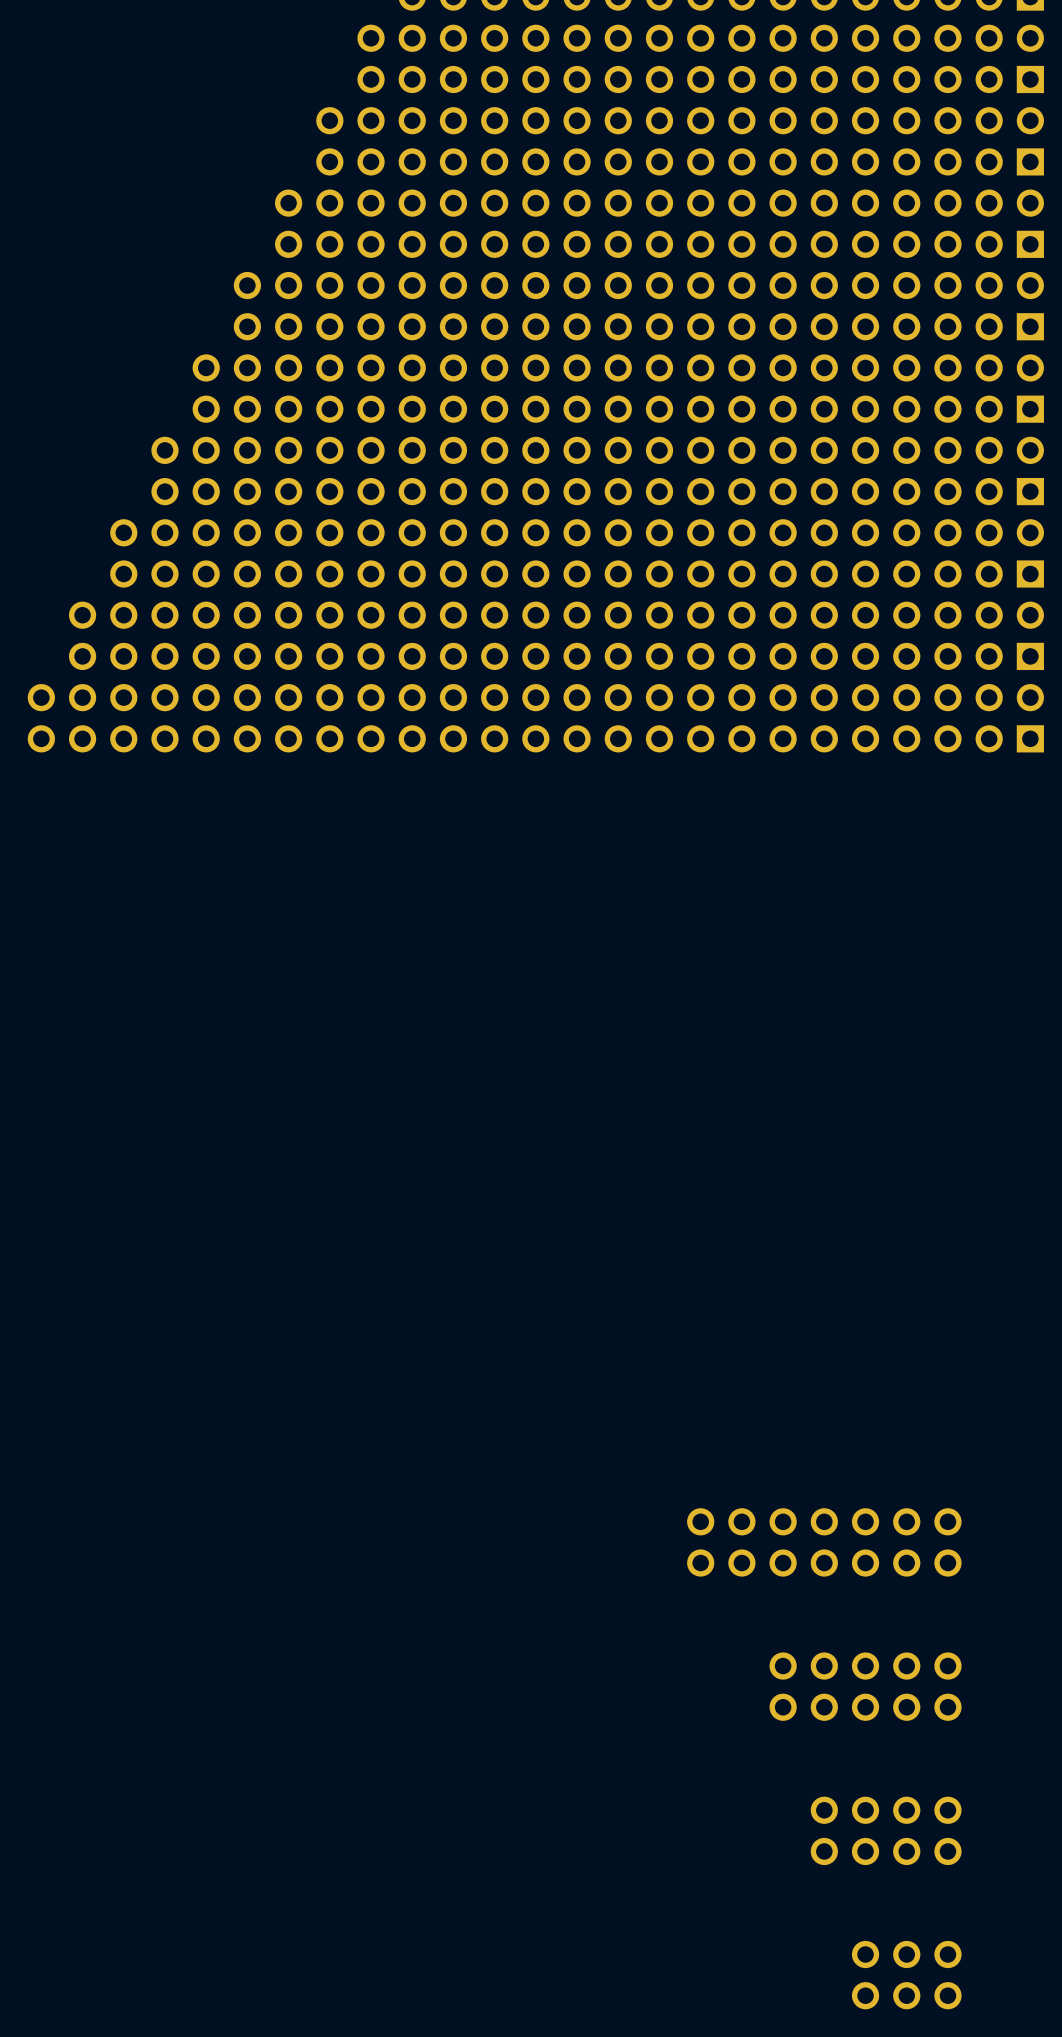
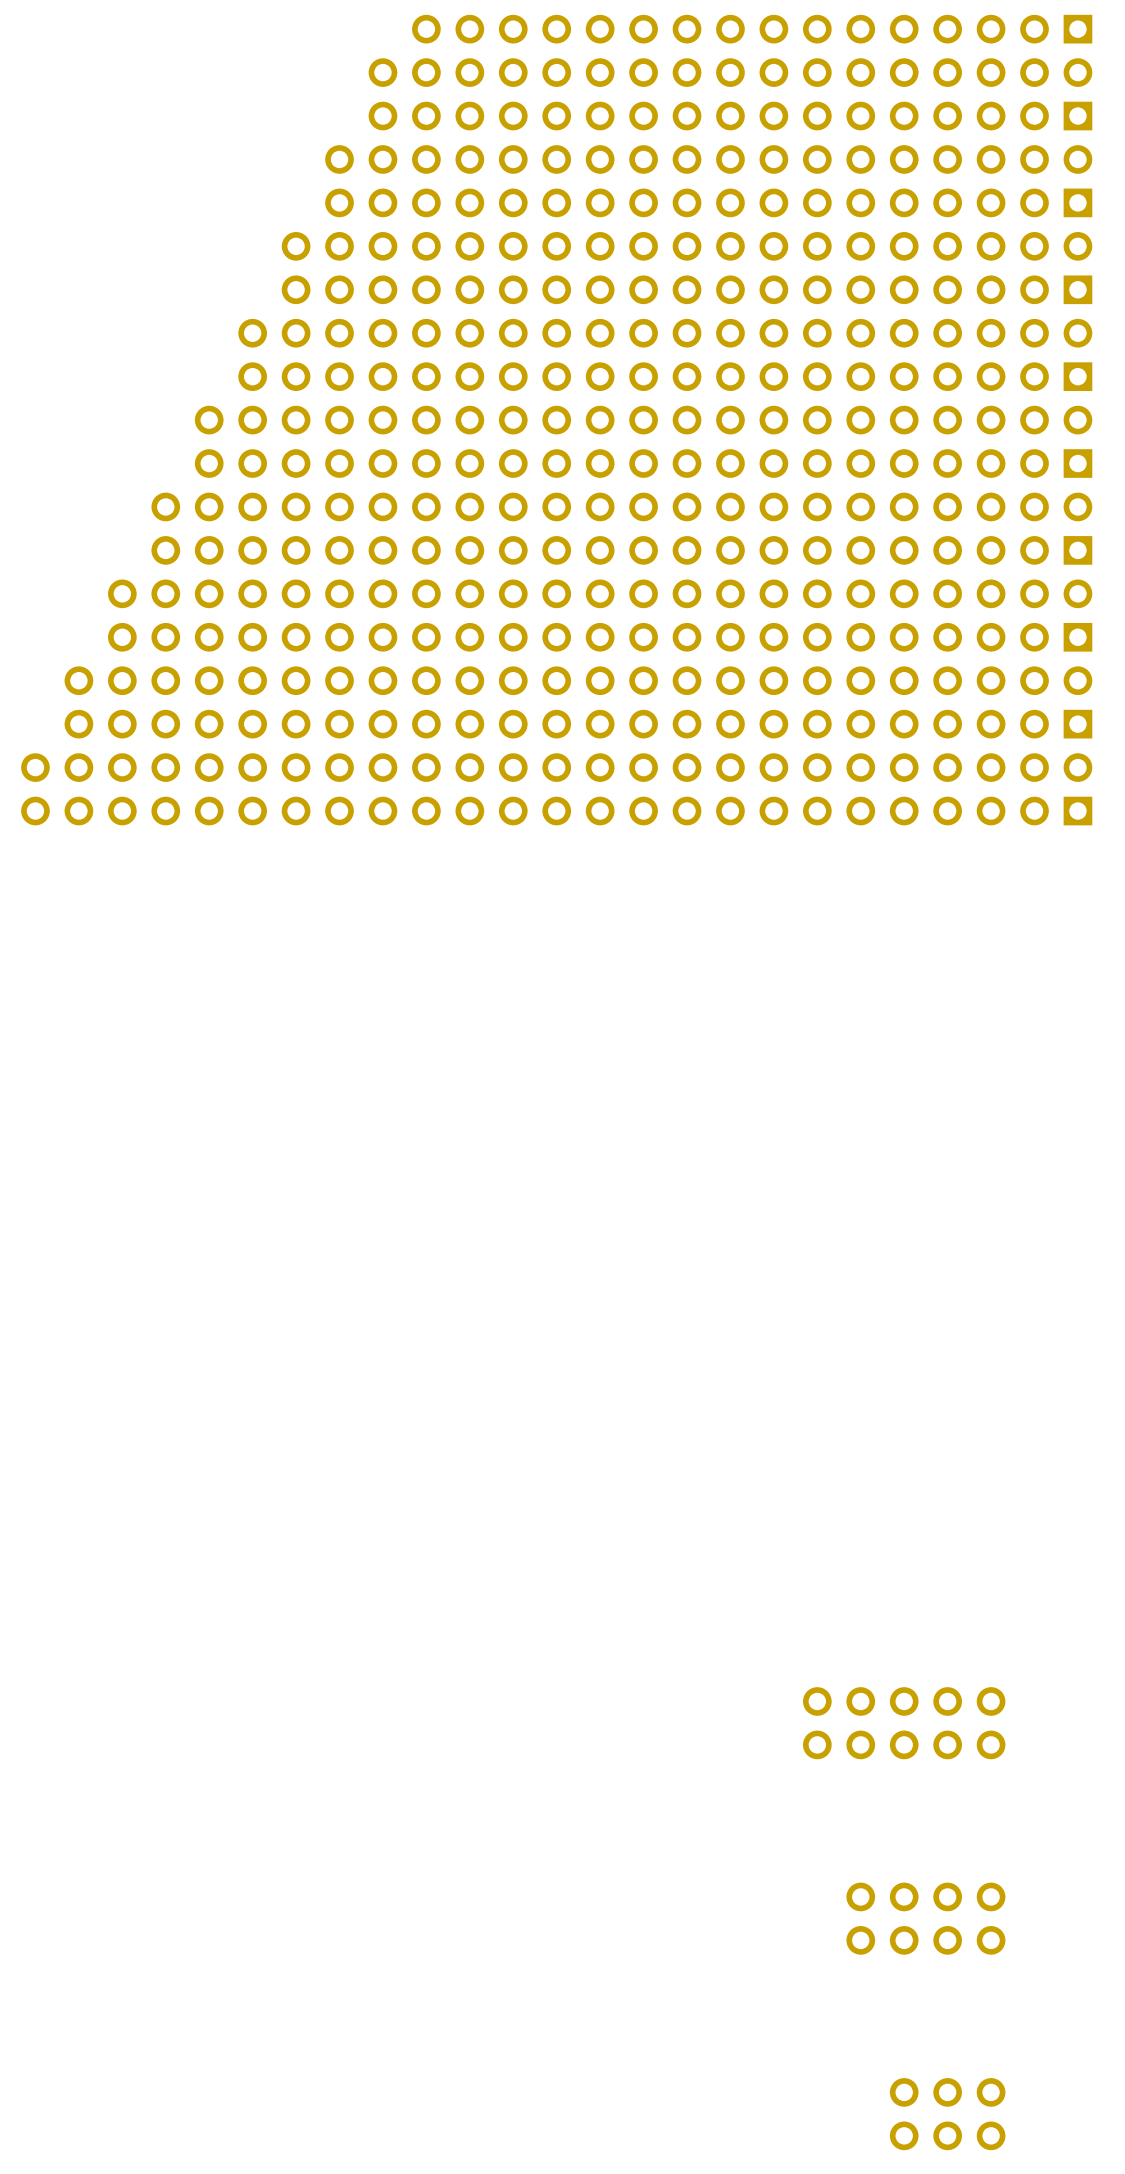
part: (824, 1542) -> none
part position: (865, 1686) -> (904, 1723)
part position: (886, 1830) -> (925, 1918)

